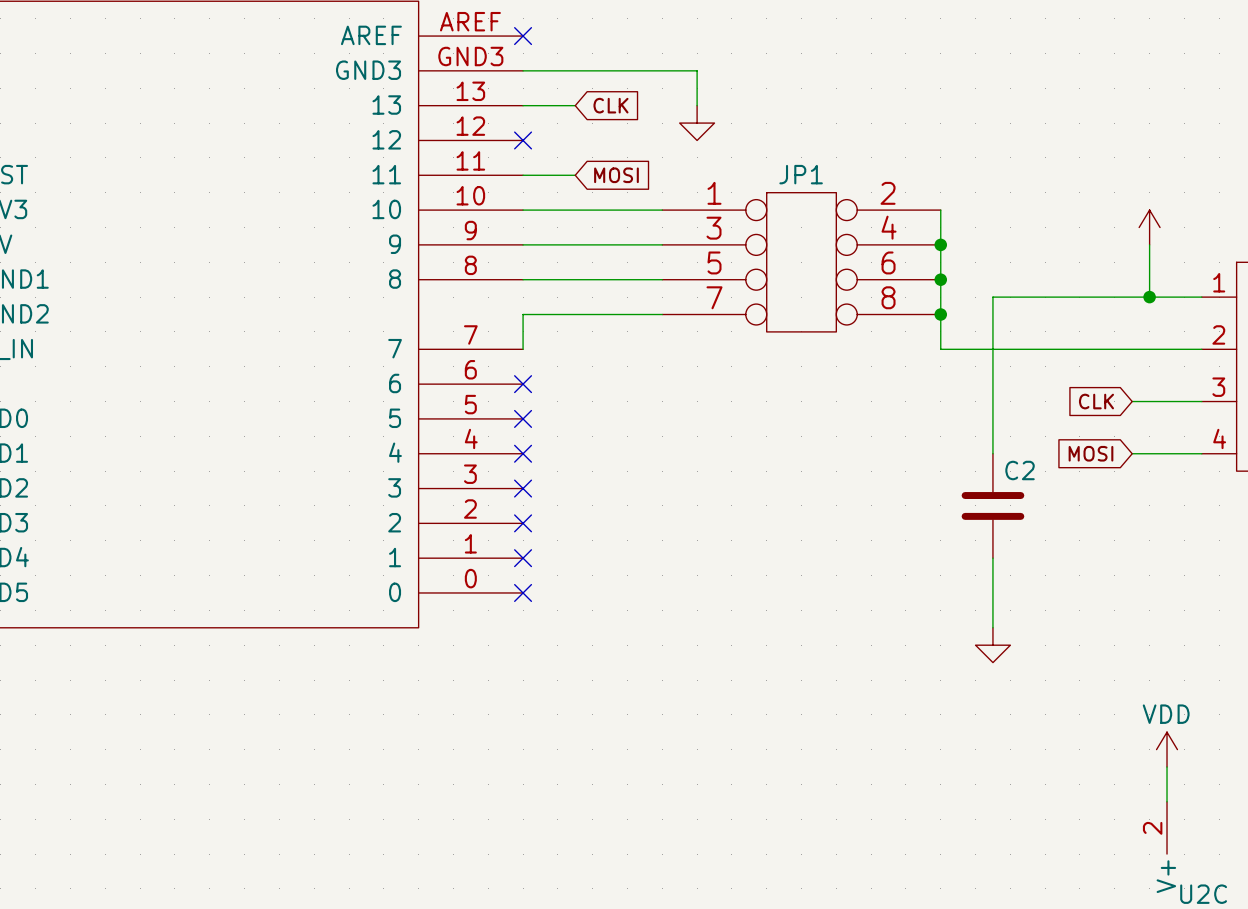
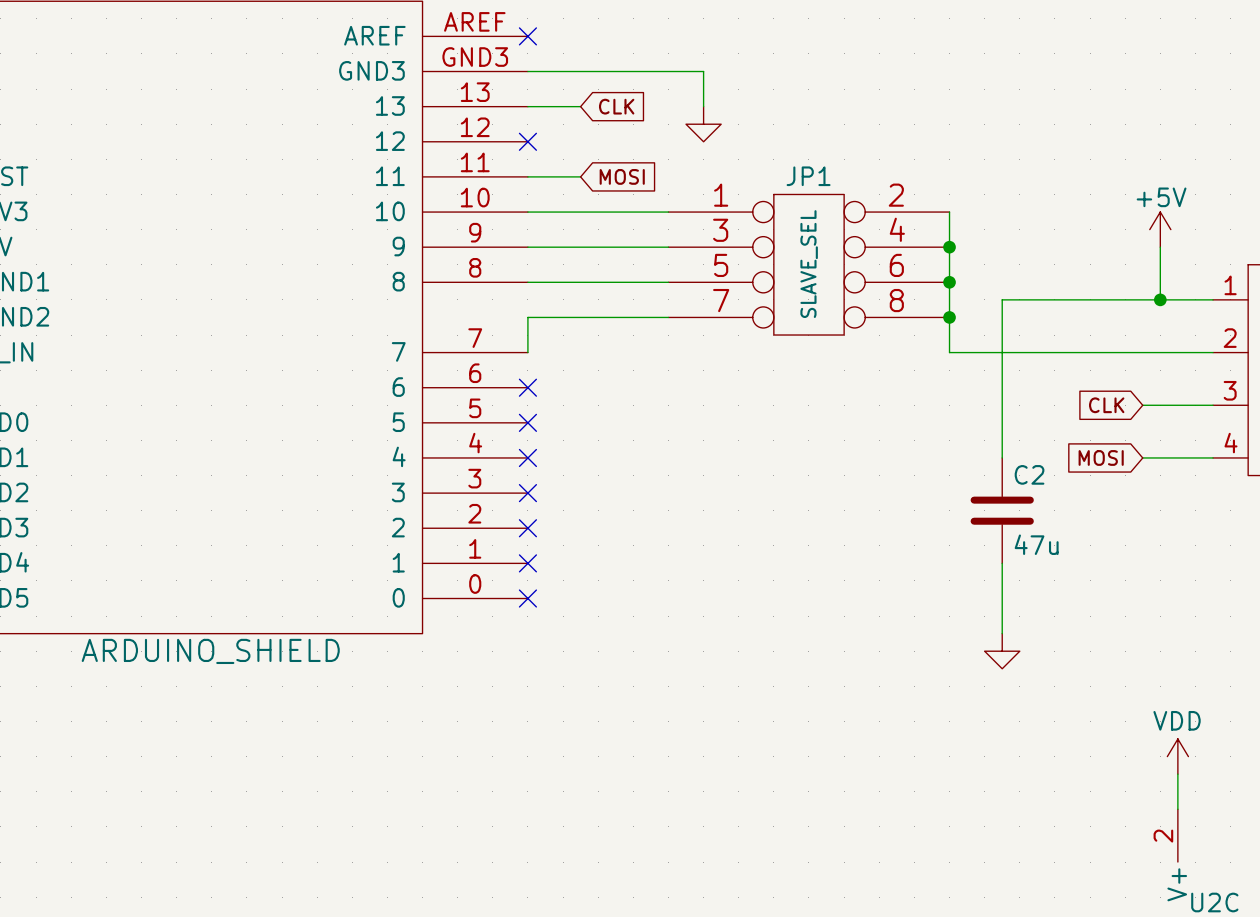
power symbol text: none -> +5V (1161, 197)
JP1 value: none -> SLAVE_SEL (809, 264)
C2 value: none -> 47u (1036, 544)
part value: none -> ARDUINO_SHIELD (210, 651)

